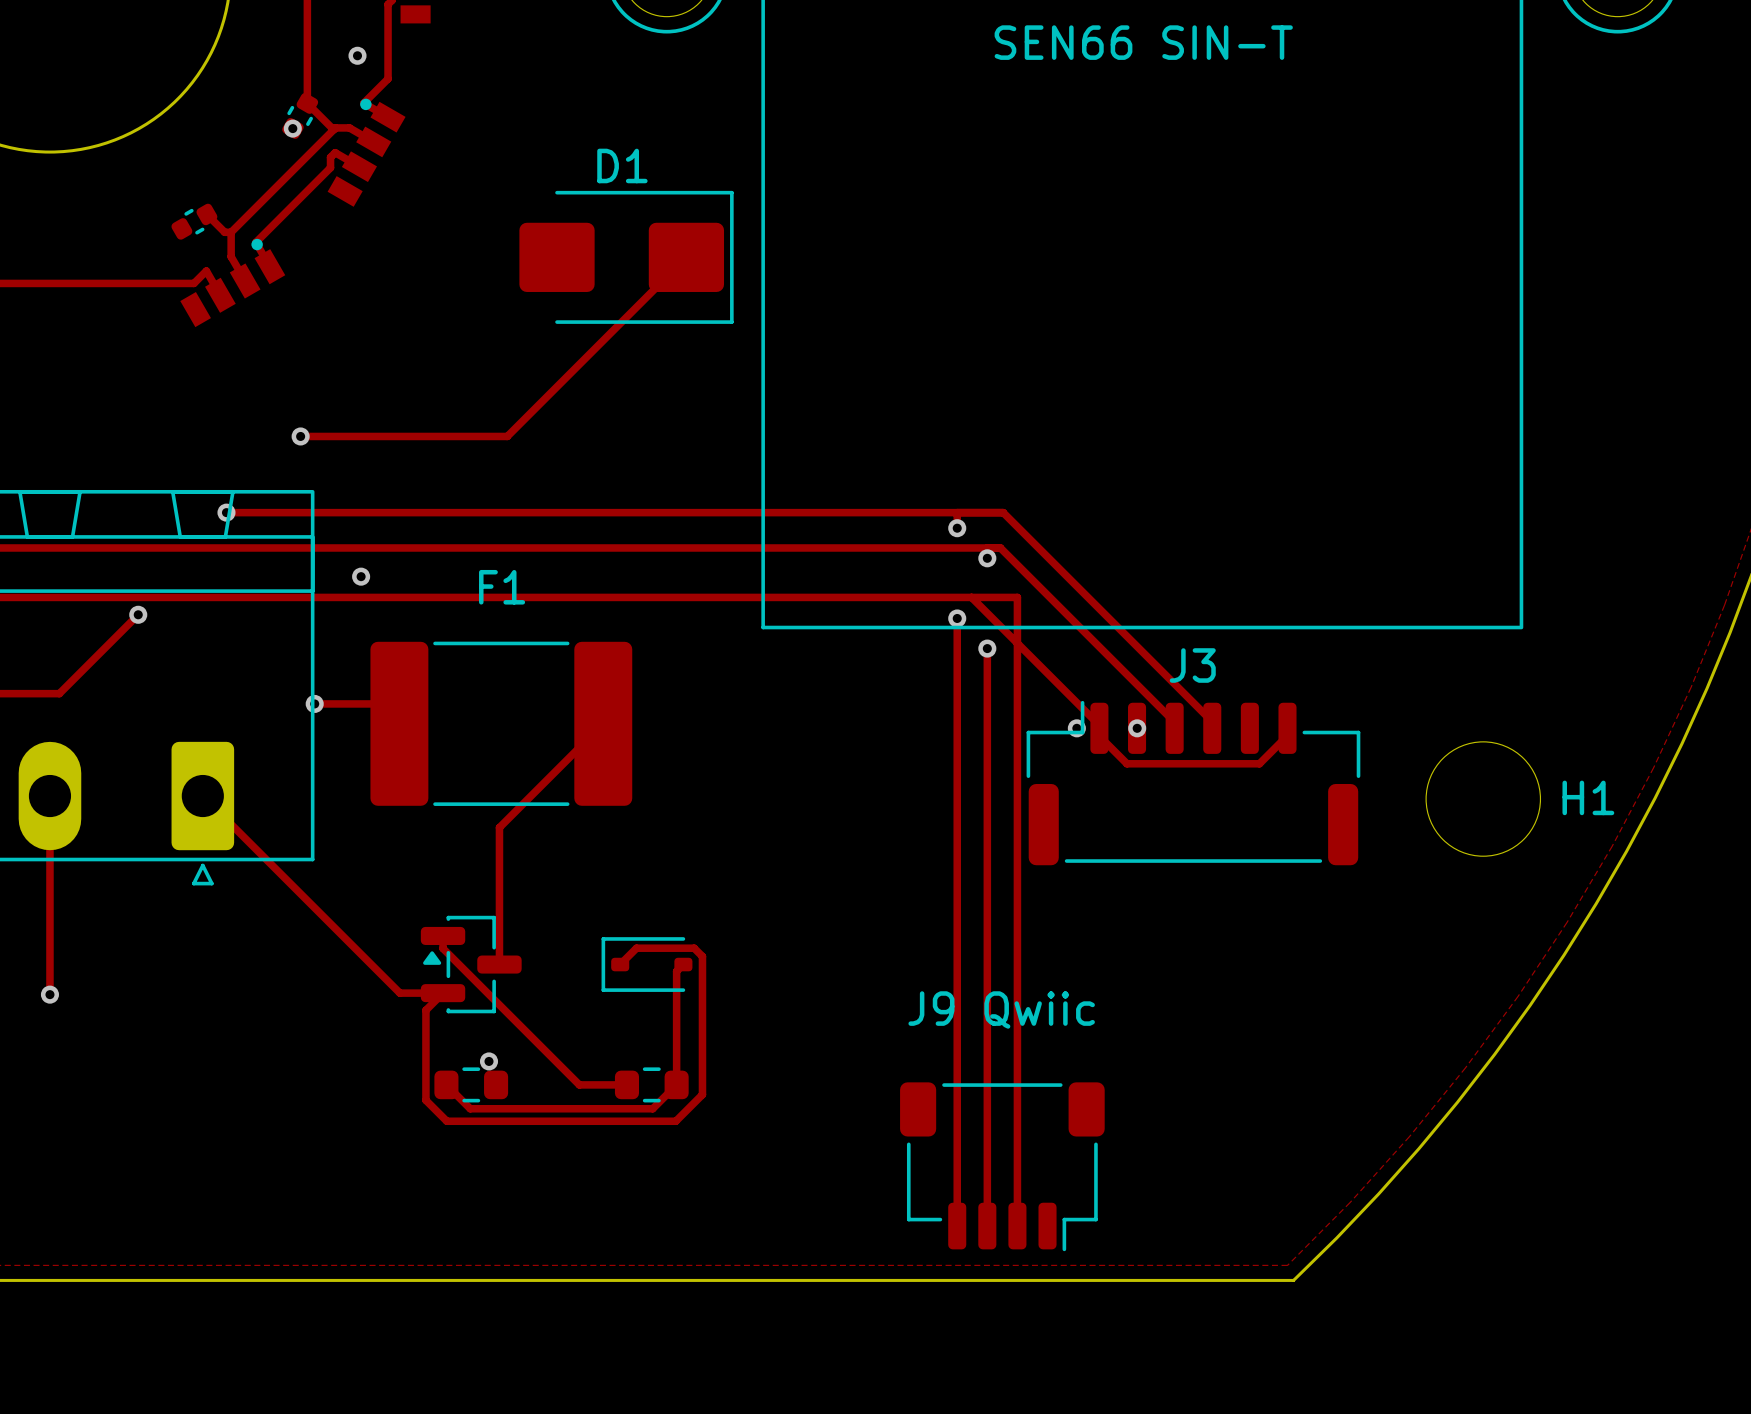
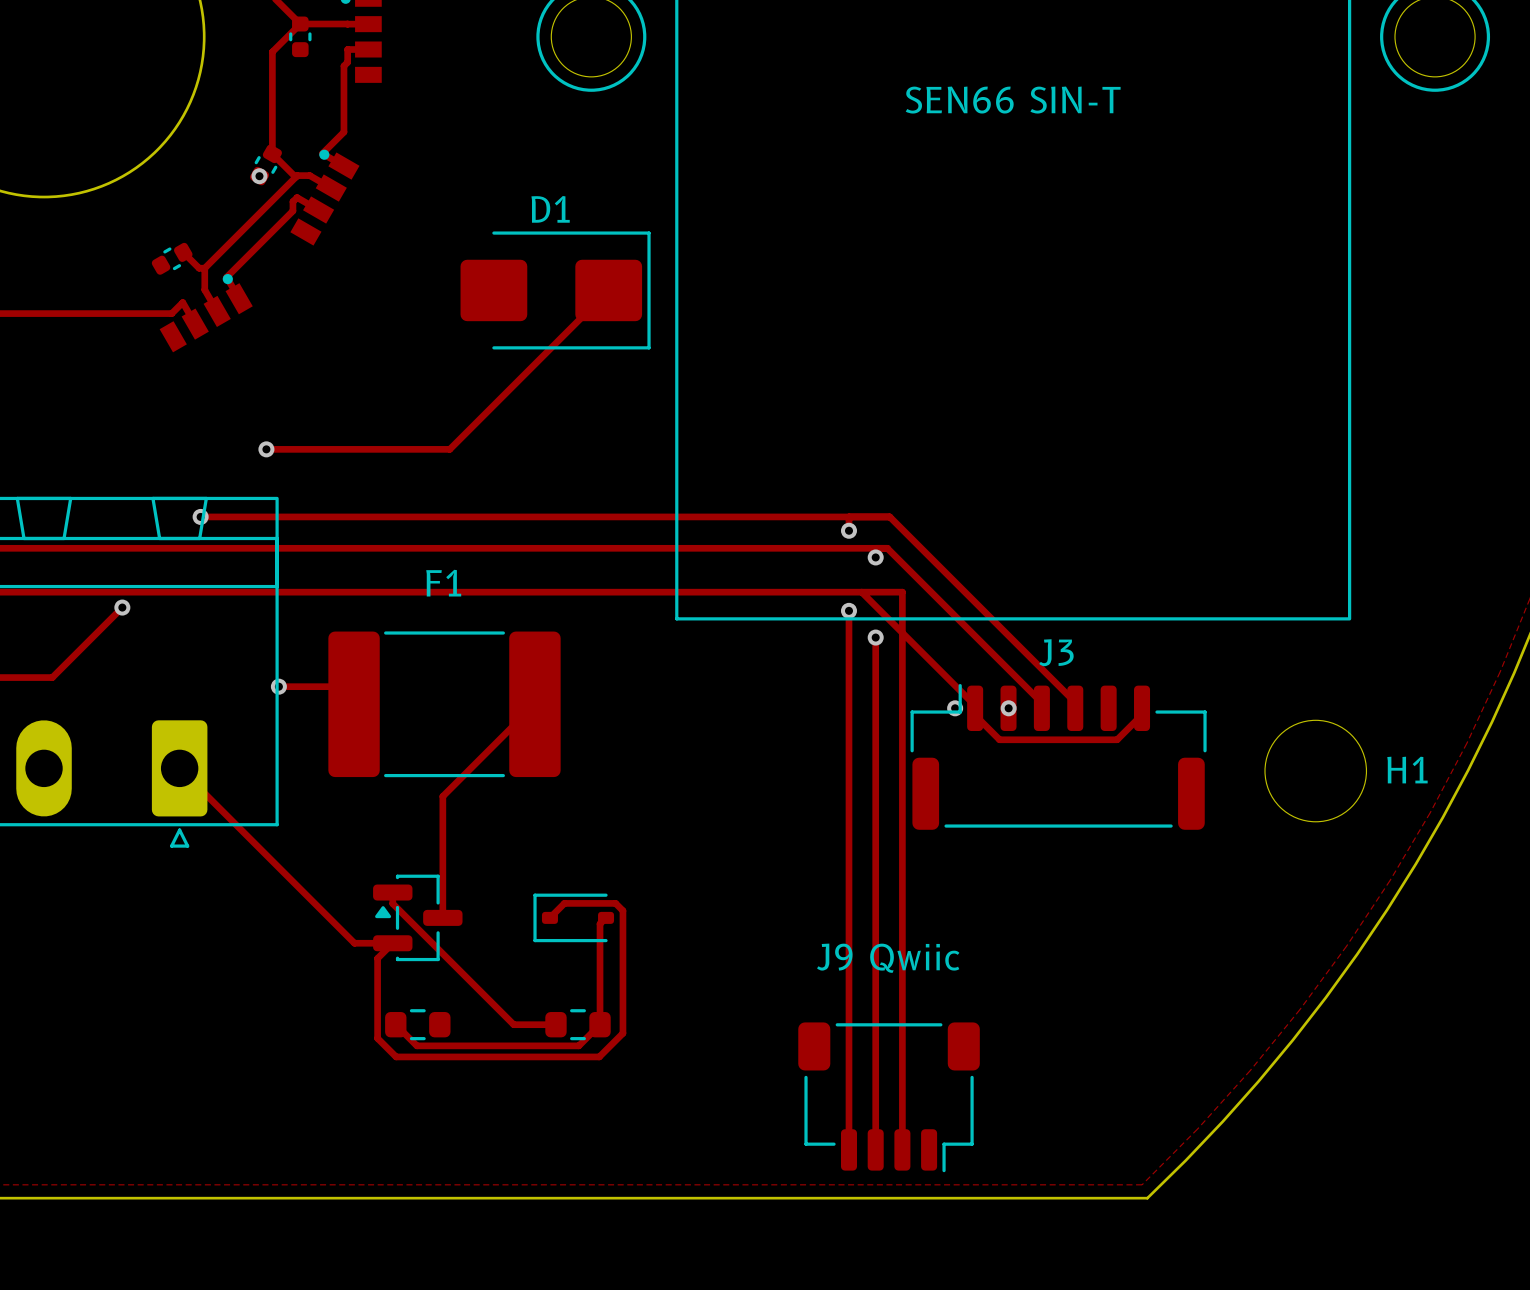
via: (357, 55) -> none
via: (361, 576) -> none
track: (49, 796) (49, 994) -> none
via: (49, 994) -> none
via: (489, 1061) -> none

